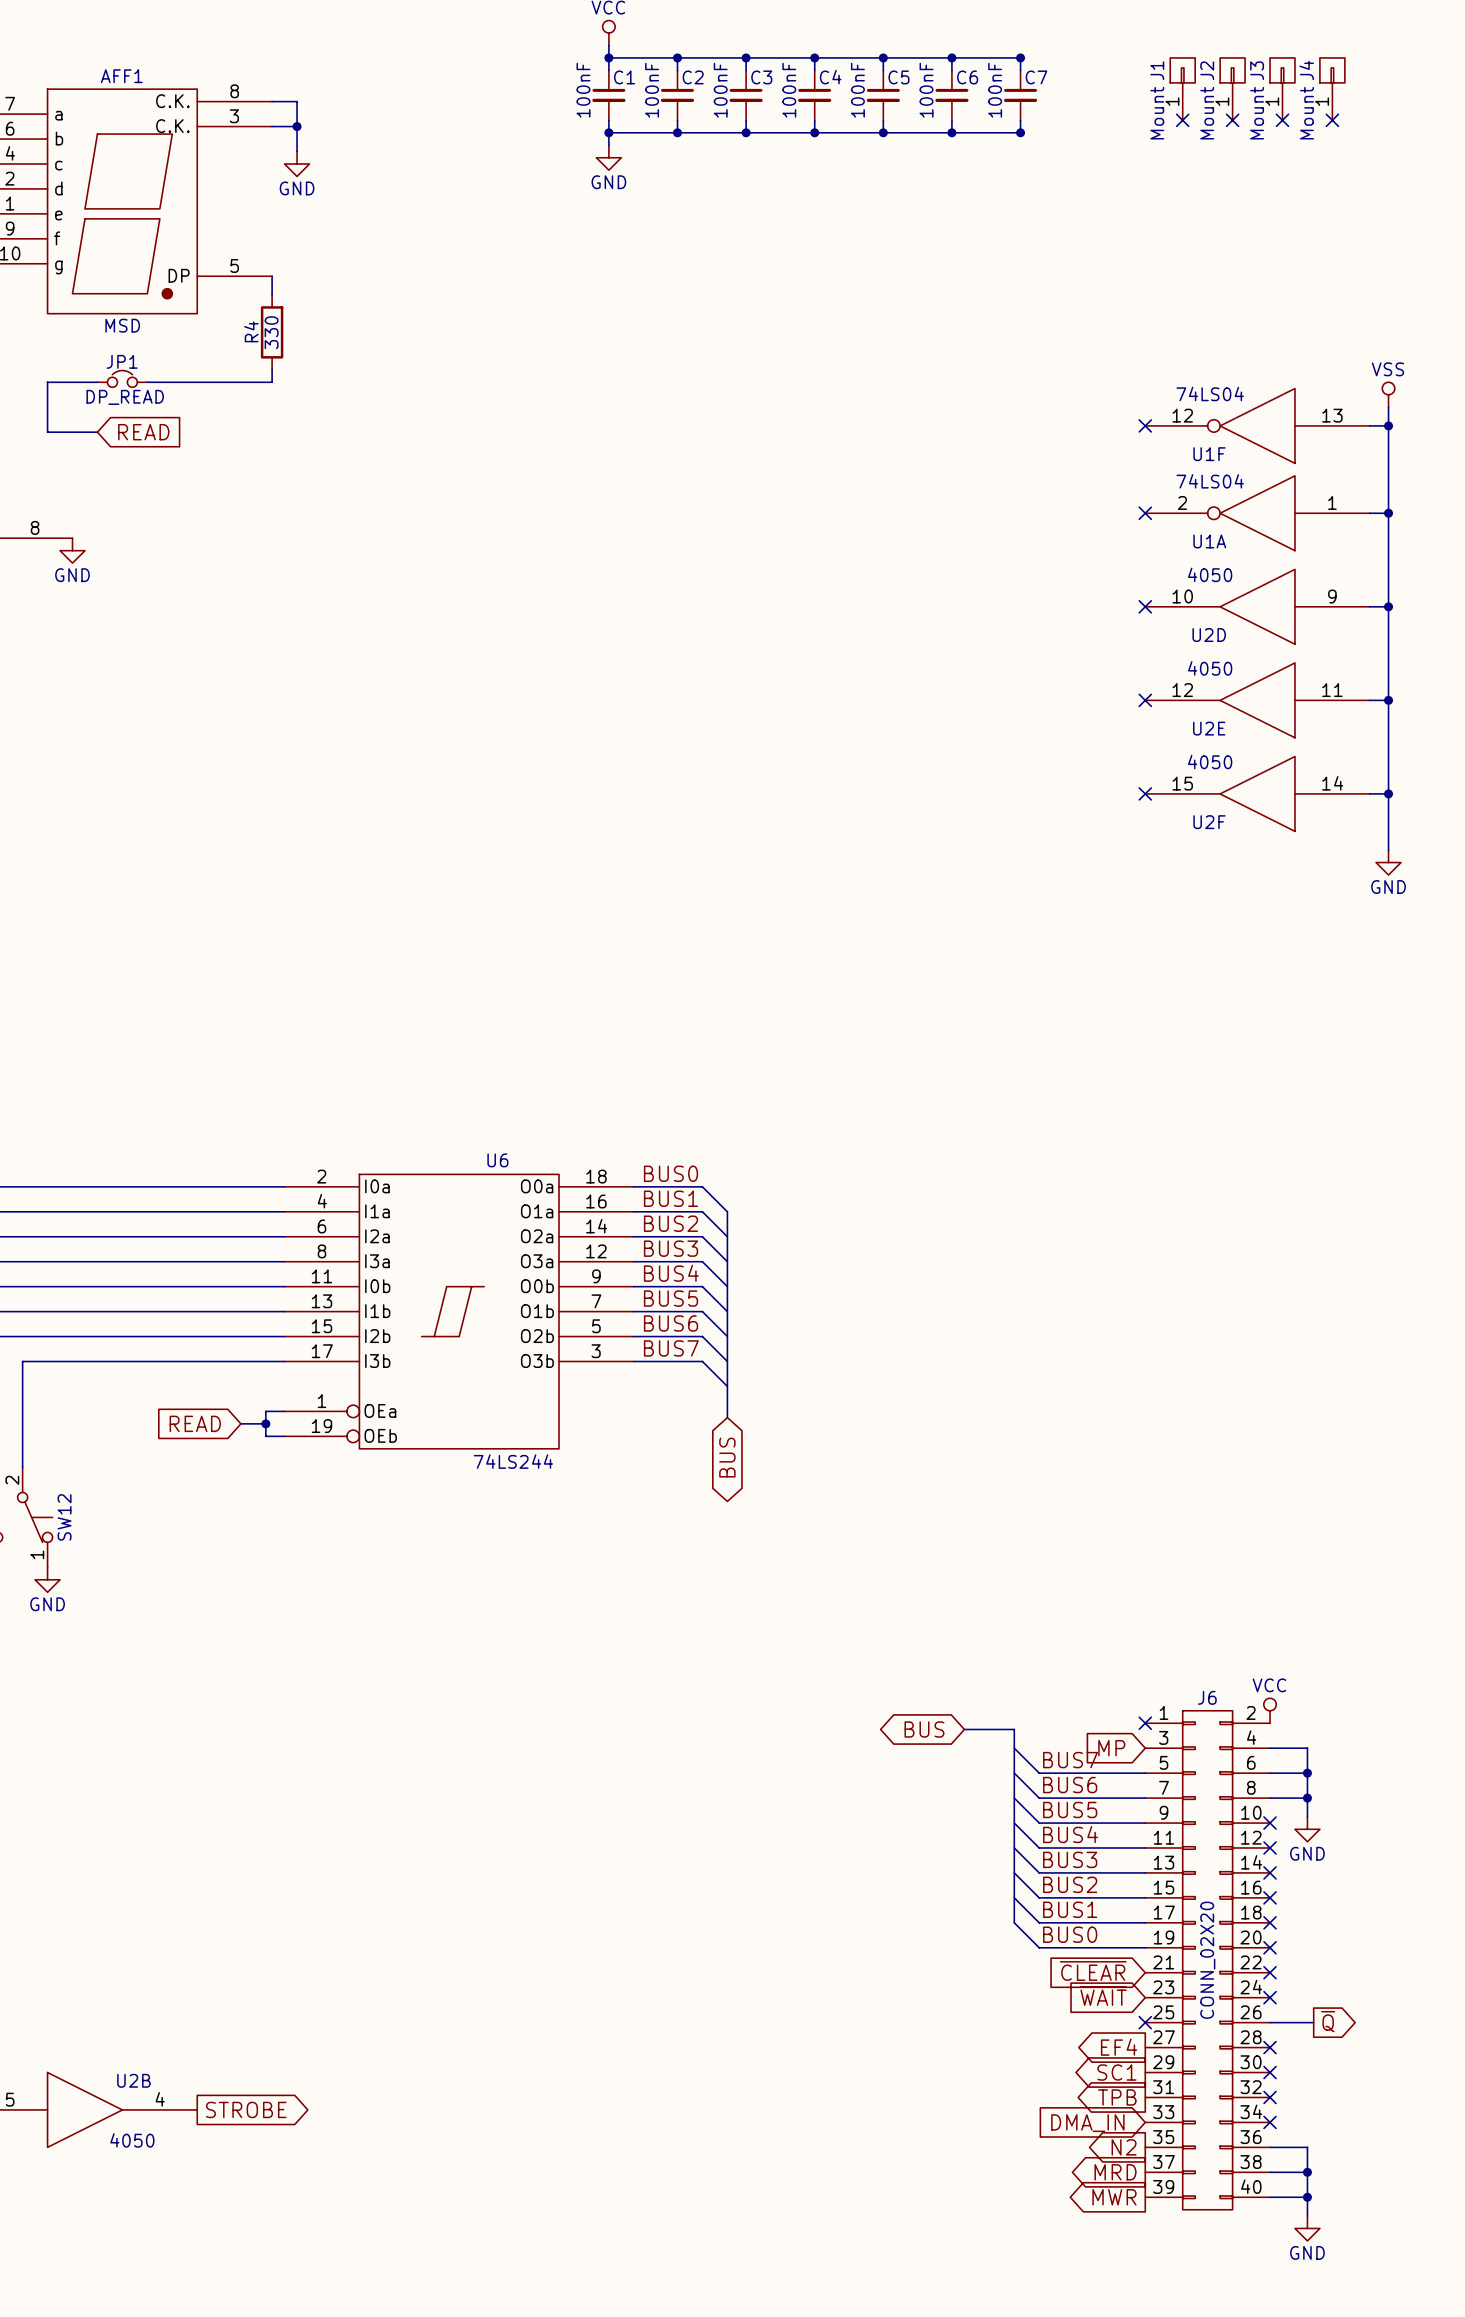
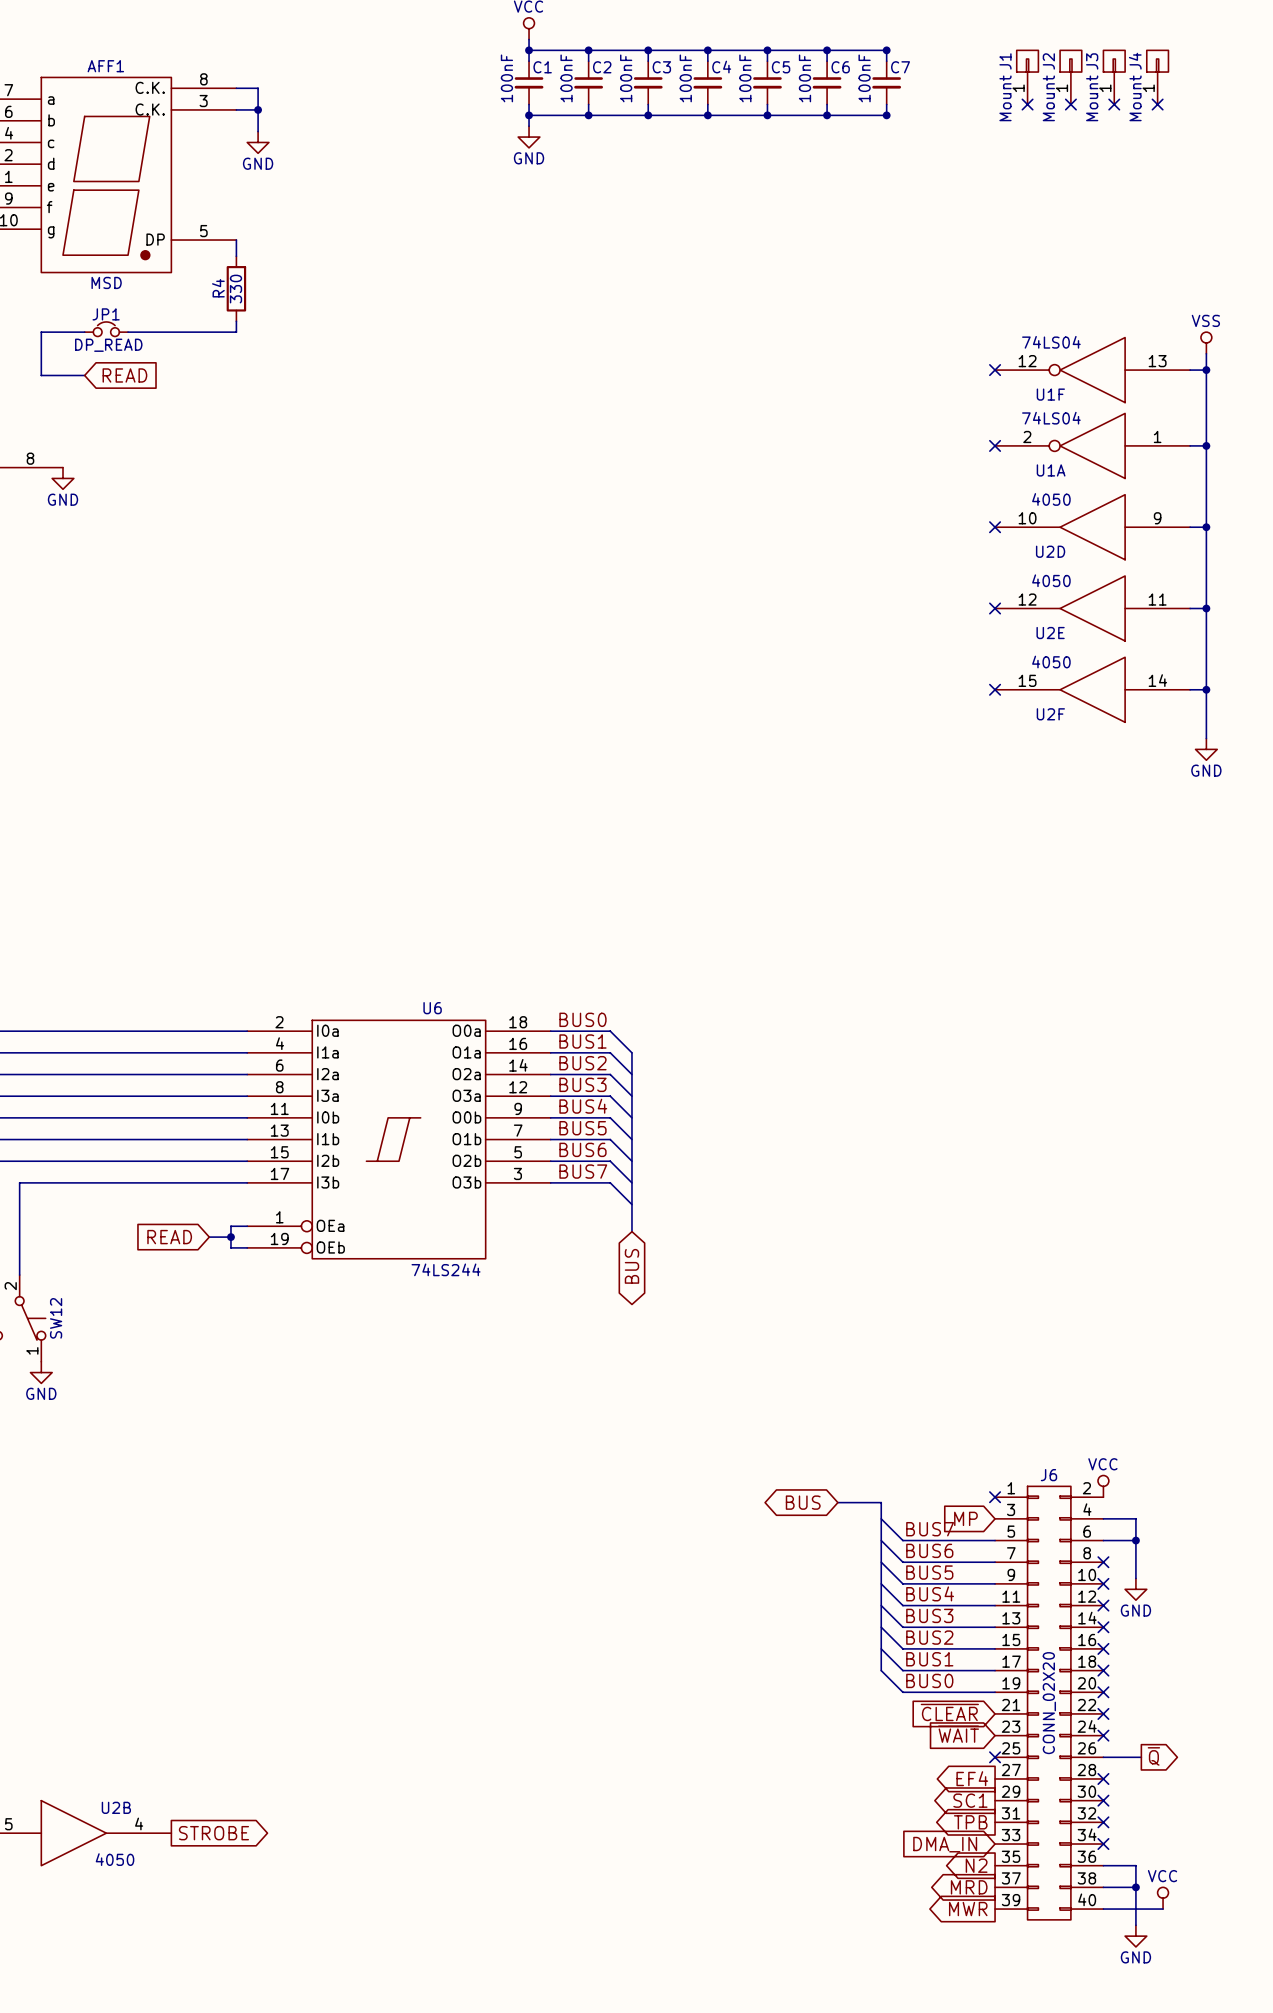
wire: (1270, 1798) (1307, 1798) -> none
no-connect mark: none -> (1103, 1562)
junction: (1307, 1798) -> none
power symbol: none -> VCC (1163, 1898)
wire: none -> (1135, 1909) (1163, 1909)
junction: (1307, 2197) -> none

